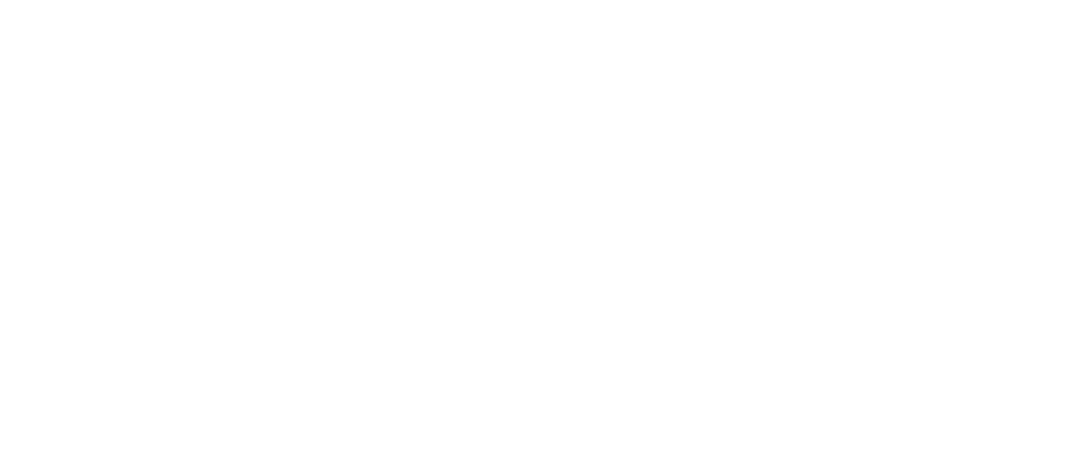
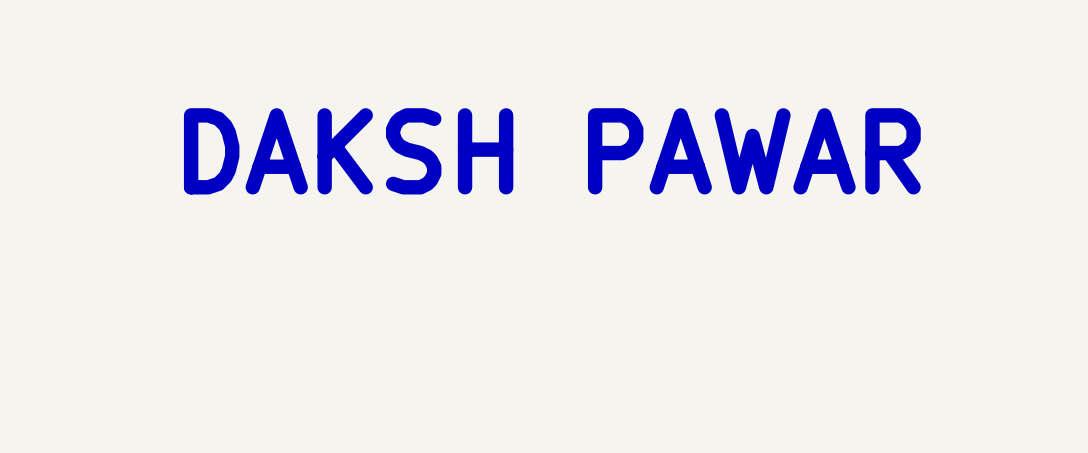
text: none -> DAKSH PAWAR (552, 151)

